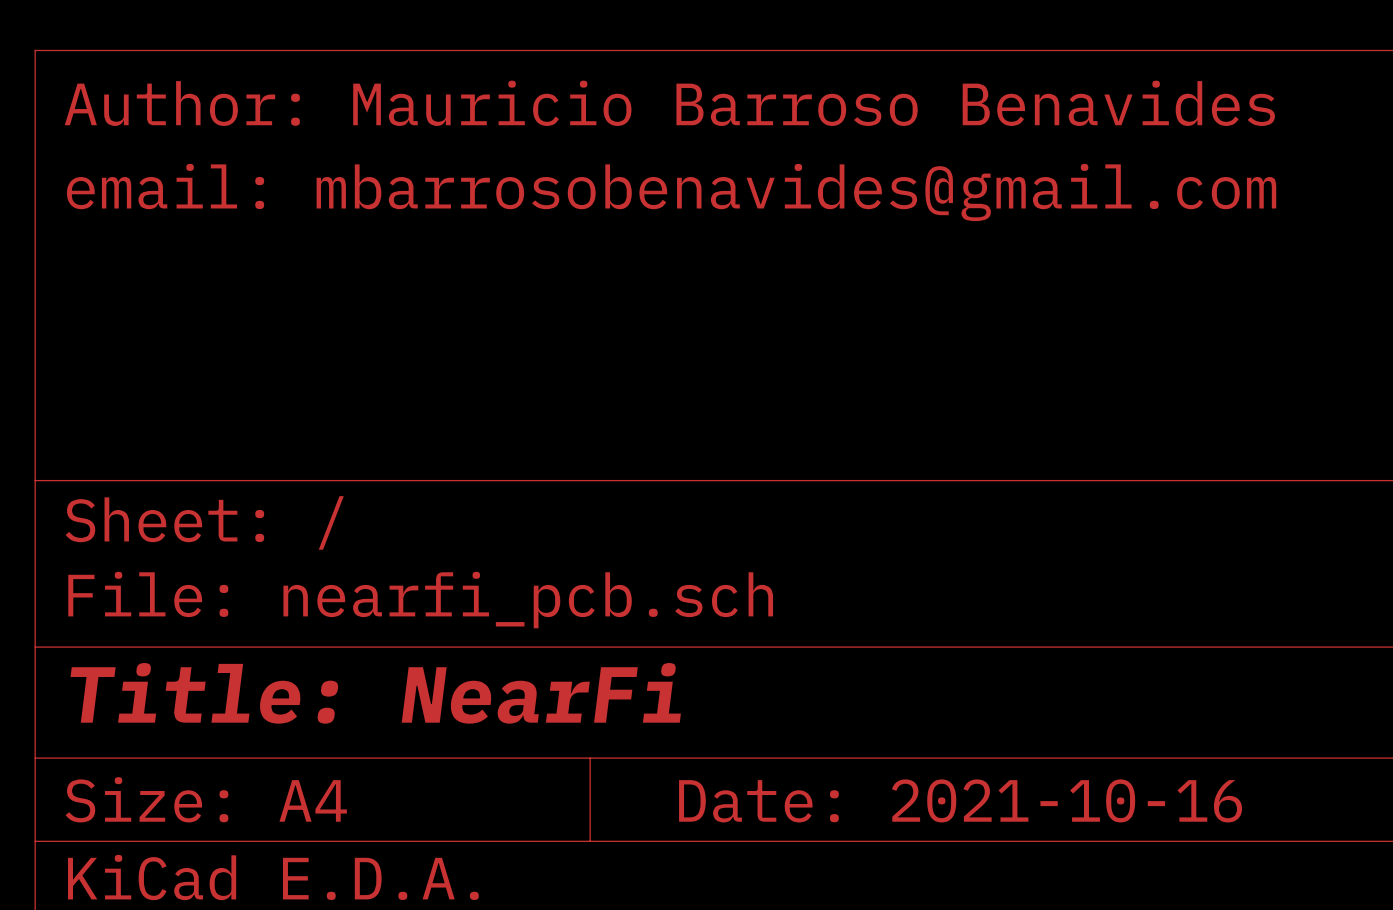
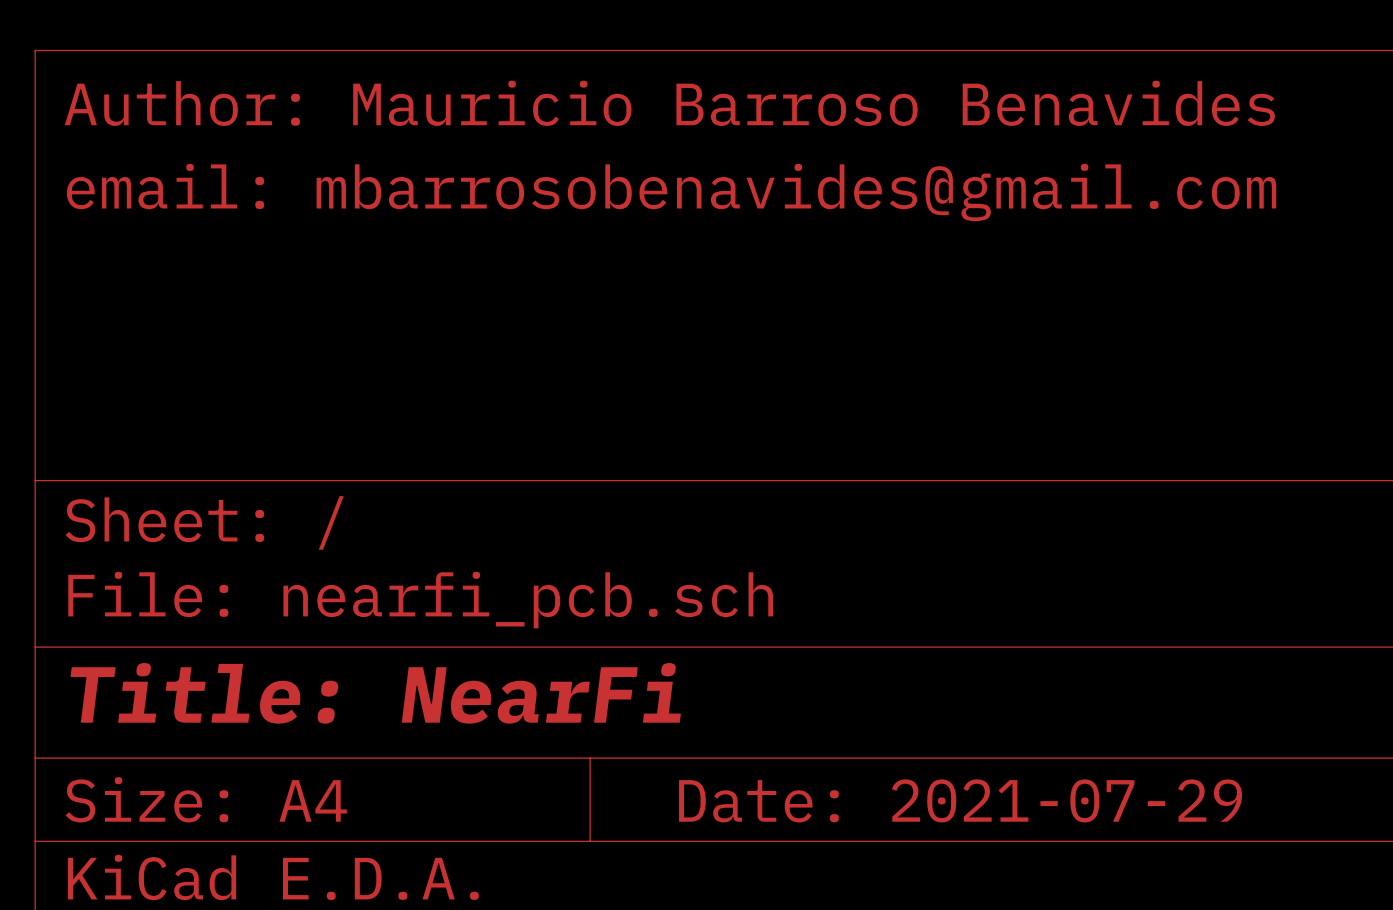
title block: Date: 2021-10-16 (960, 800) -> Date: 2021-07-29 (960, 800)

